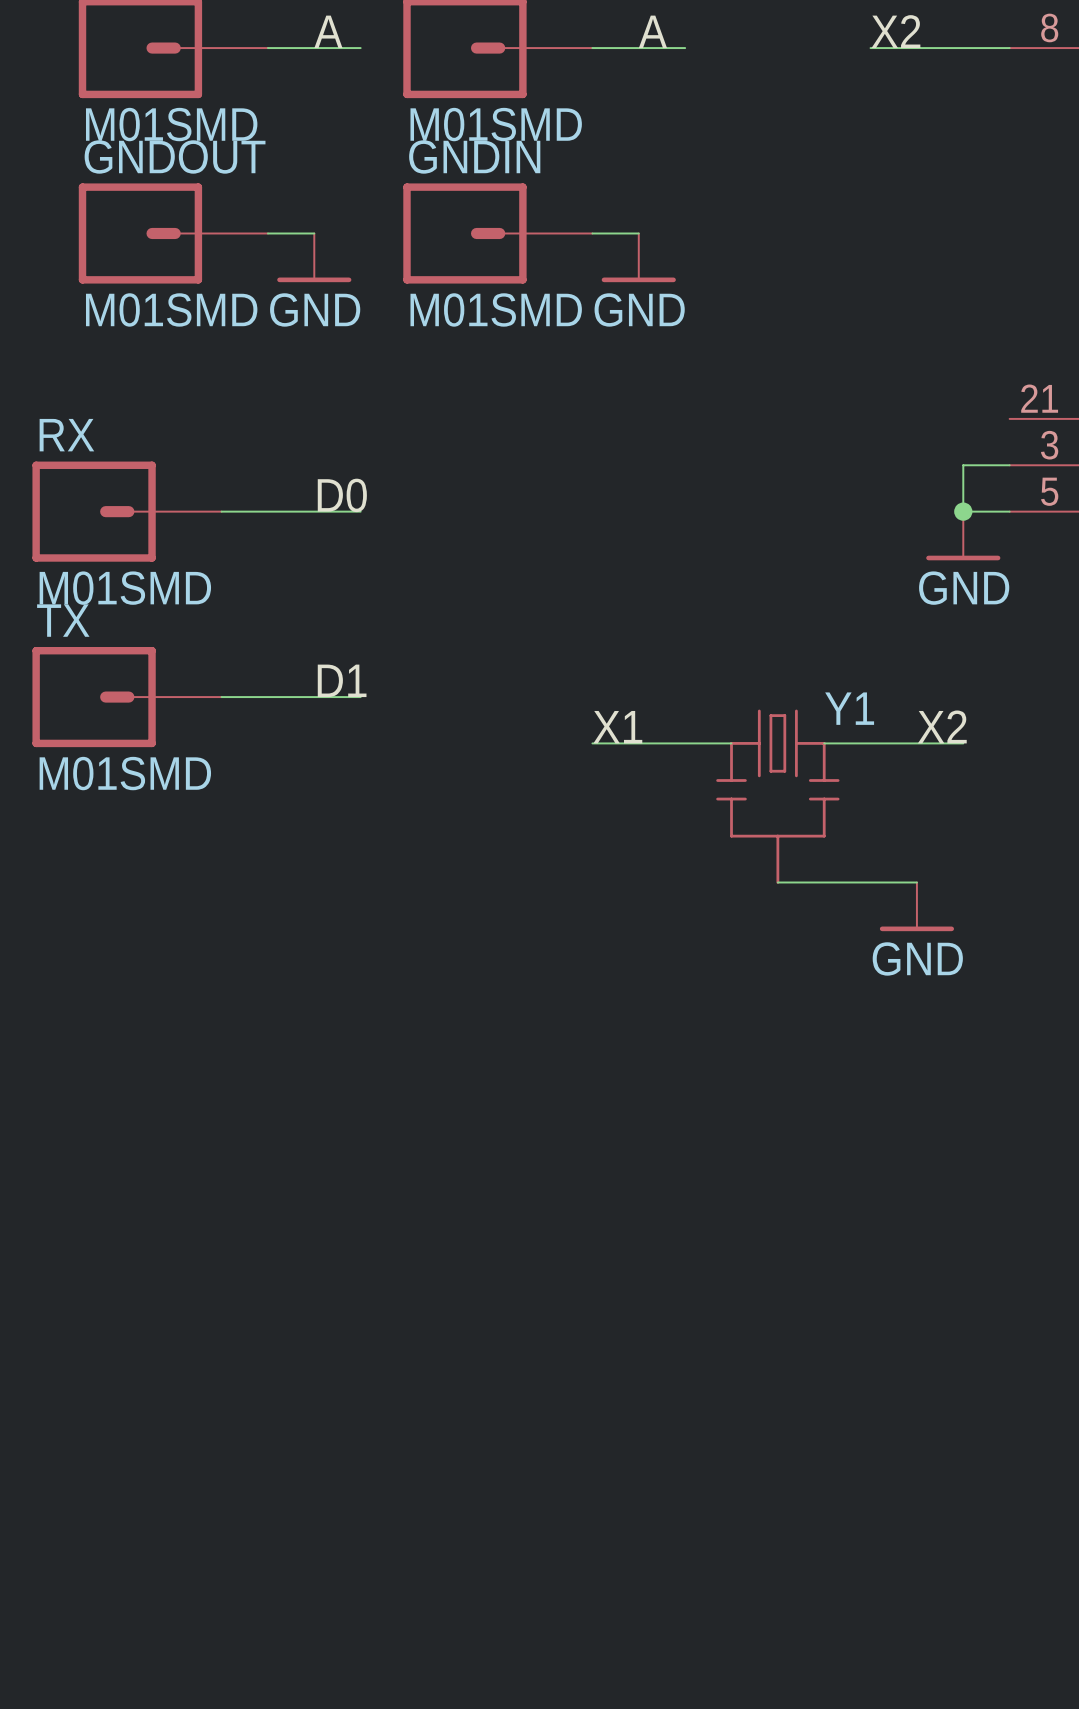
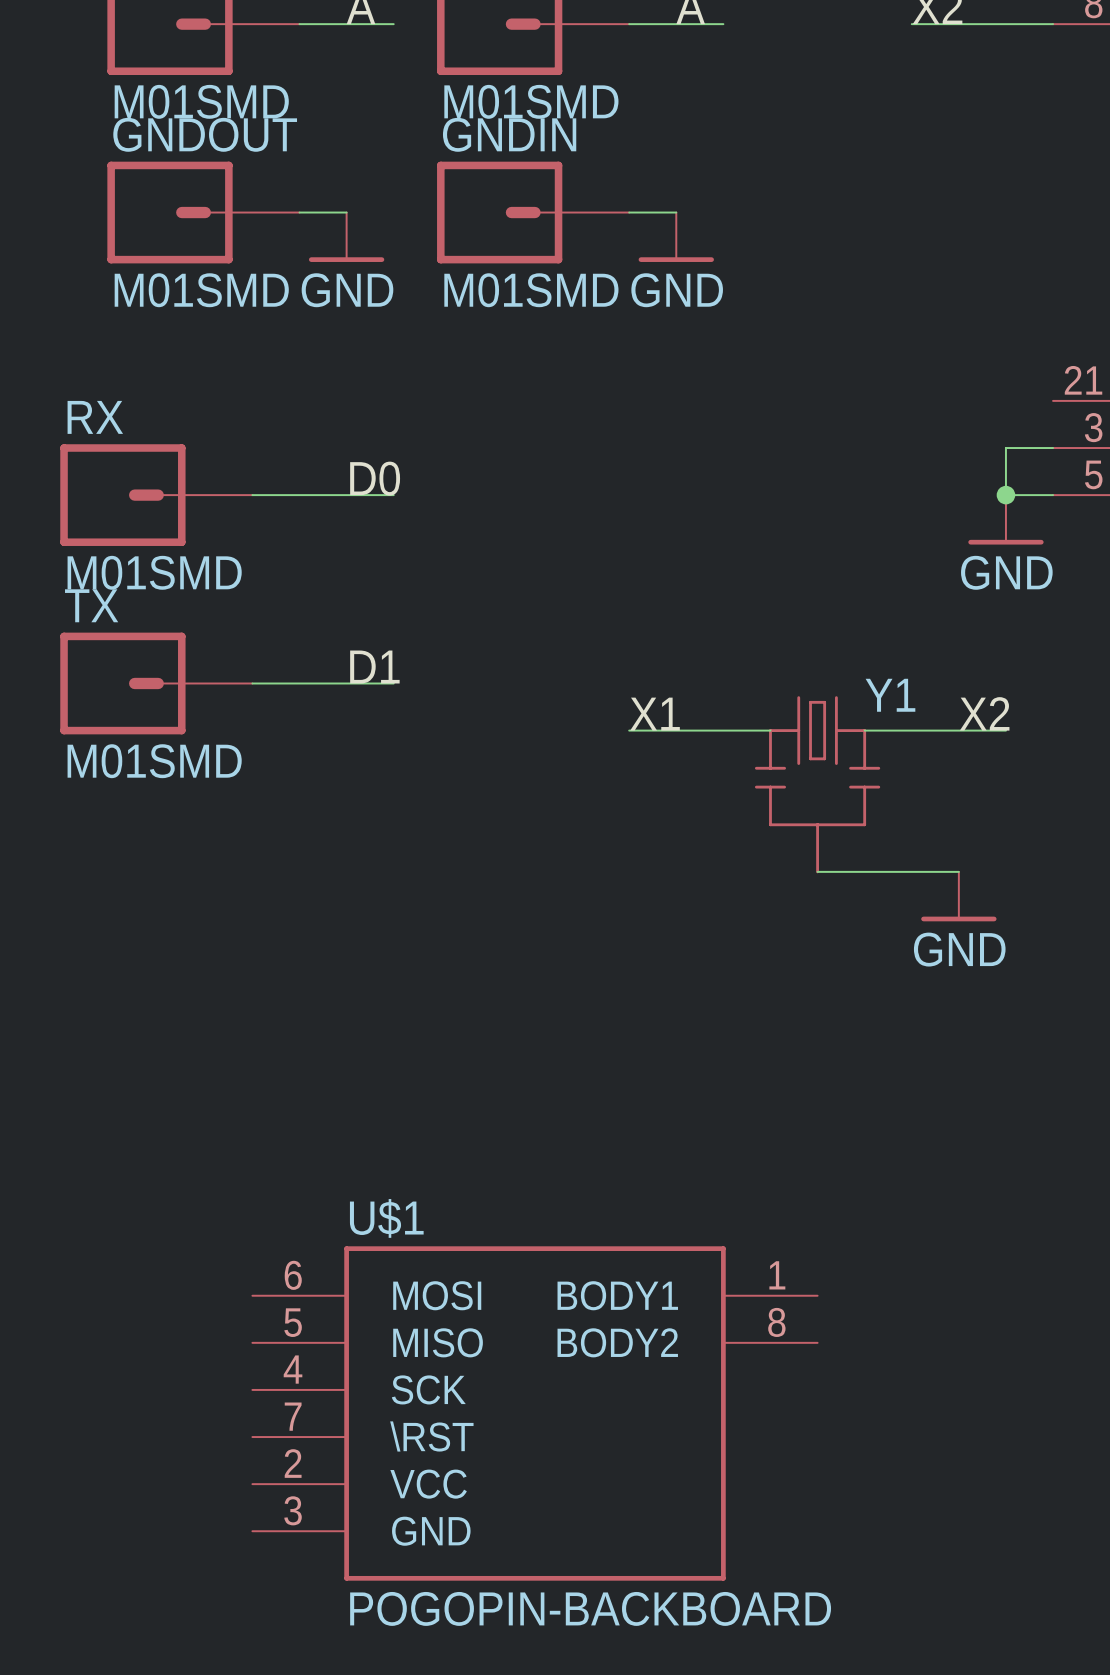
U$1: none -> POGOPIN-BACKBOARD (535, 1413)

